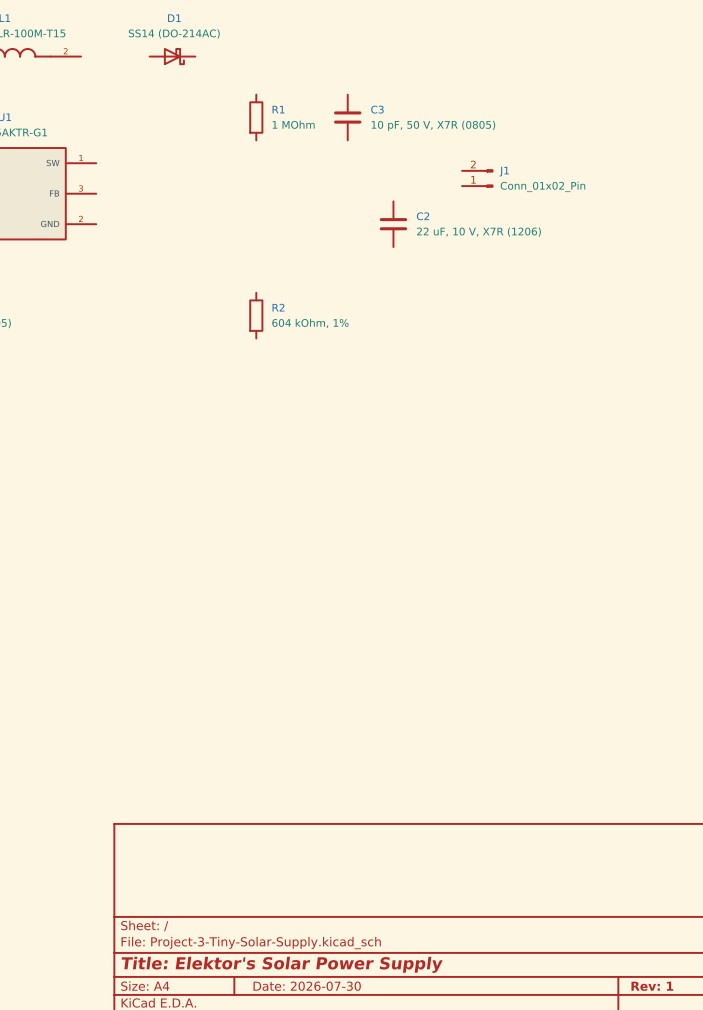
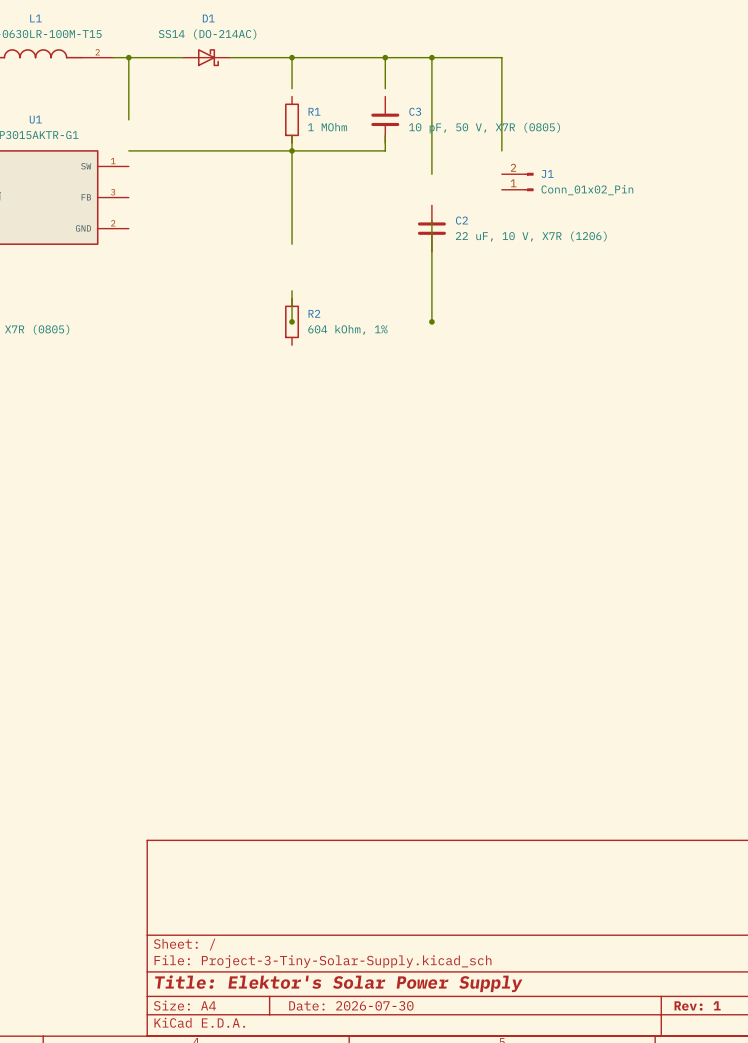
wire: none -> (113, 57) (183, 57)
wire: none -> (128, 57) (128, 119)
junction: none -> (128, 57)
wire: none -> (229, 57) (501, 57) (501, 150)
wire: none -> (292, 57) (292, 88)
junction: none -> (292, 57)
wire: none -> (385, 57) (385, 88)
junction: none -> (385, 57)
wire: none -> (431, 57) (431, 174)
junction: none -> (431, 57)
wire: none -> (292, 135) (292, 244)
wire: none -> (385, 135) (385, 150) (128, 150)
junction: none -> (292, 150)
wire: none -> (431, 220) (431, 321)
wire: none -> (292, 290) (292, 321)
junction: none -> (292, 321)
junction: none -> (431, 321)

